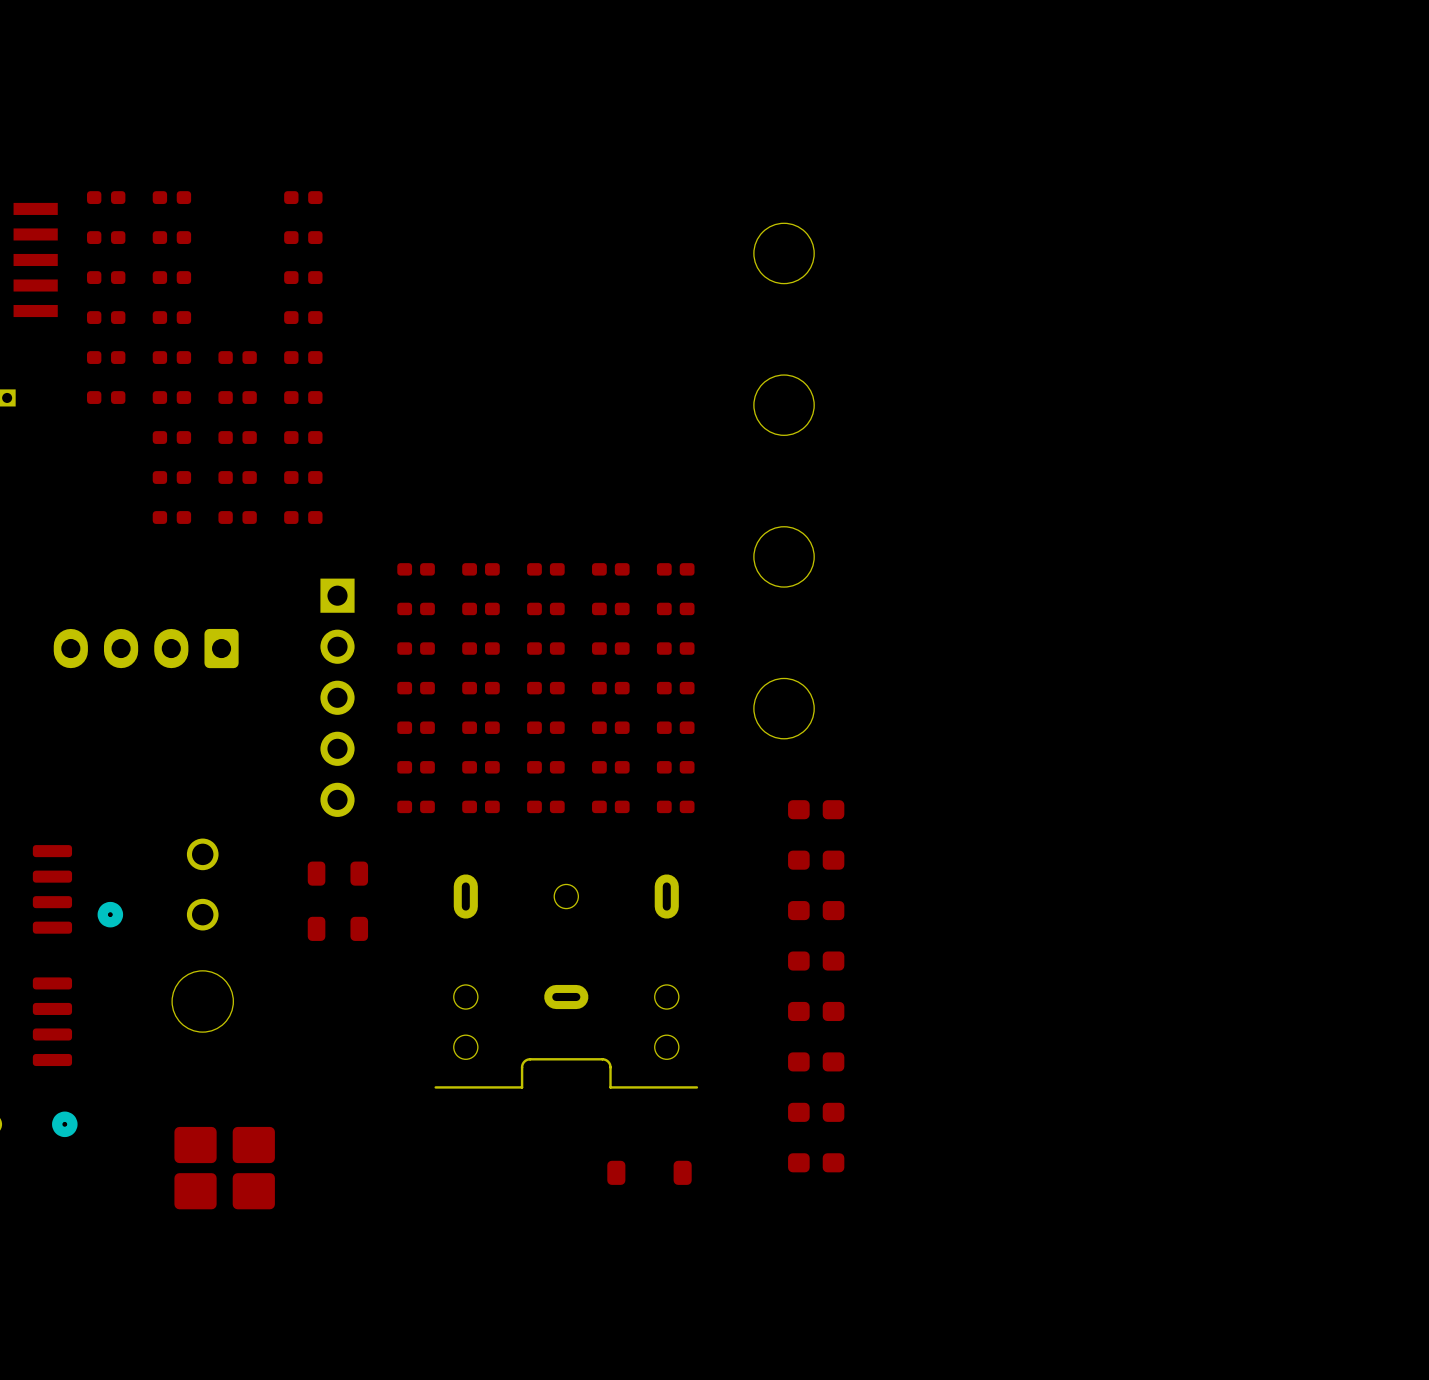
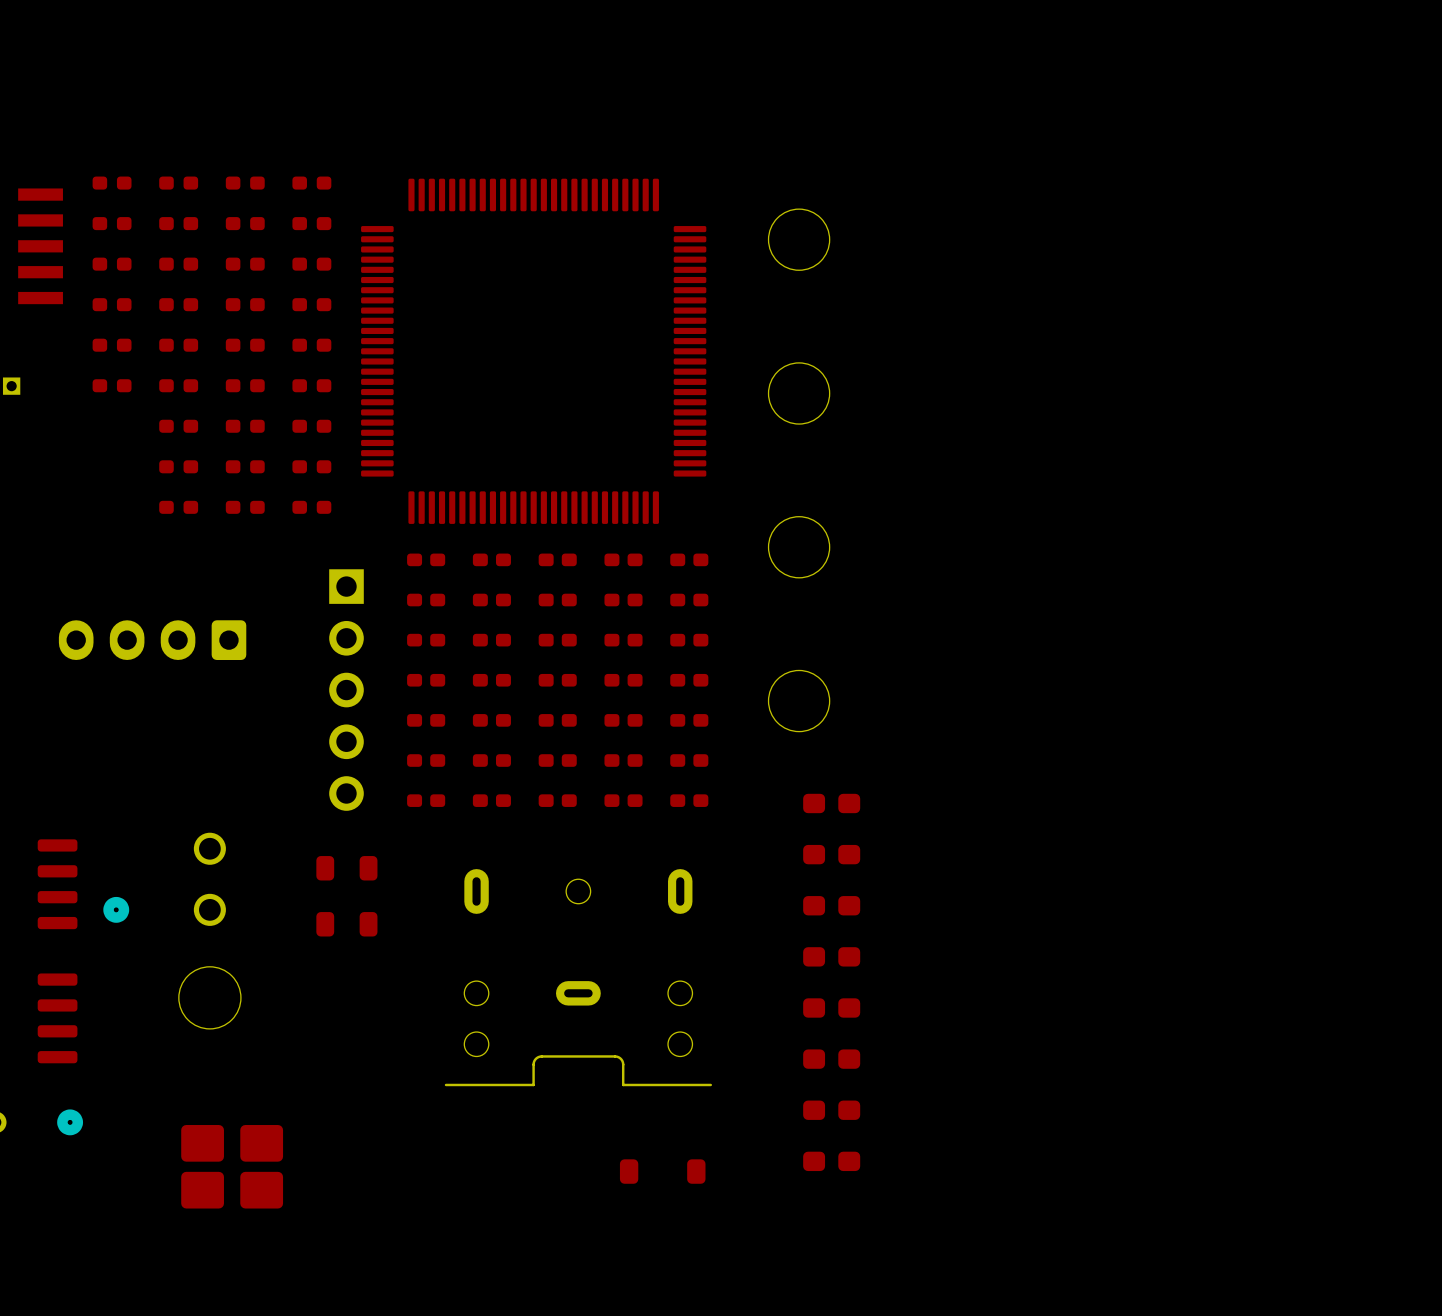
part: none -> (245, 183)
part: none -> (245, 223)
part: none -> (245, 264)
part: none -> (245, 304)
part: none -> (533, 351)

